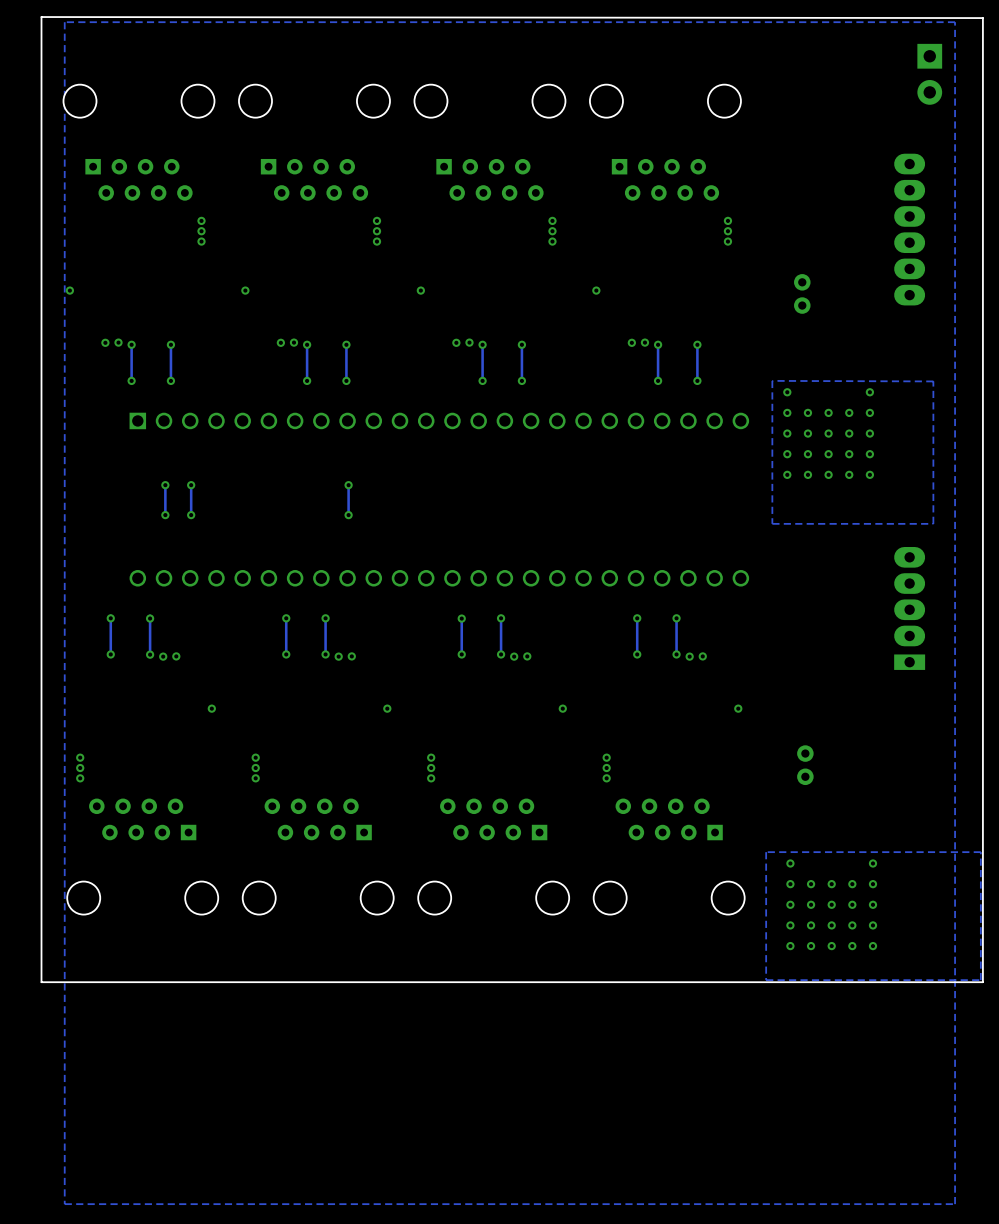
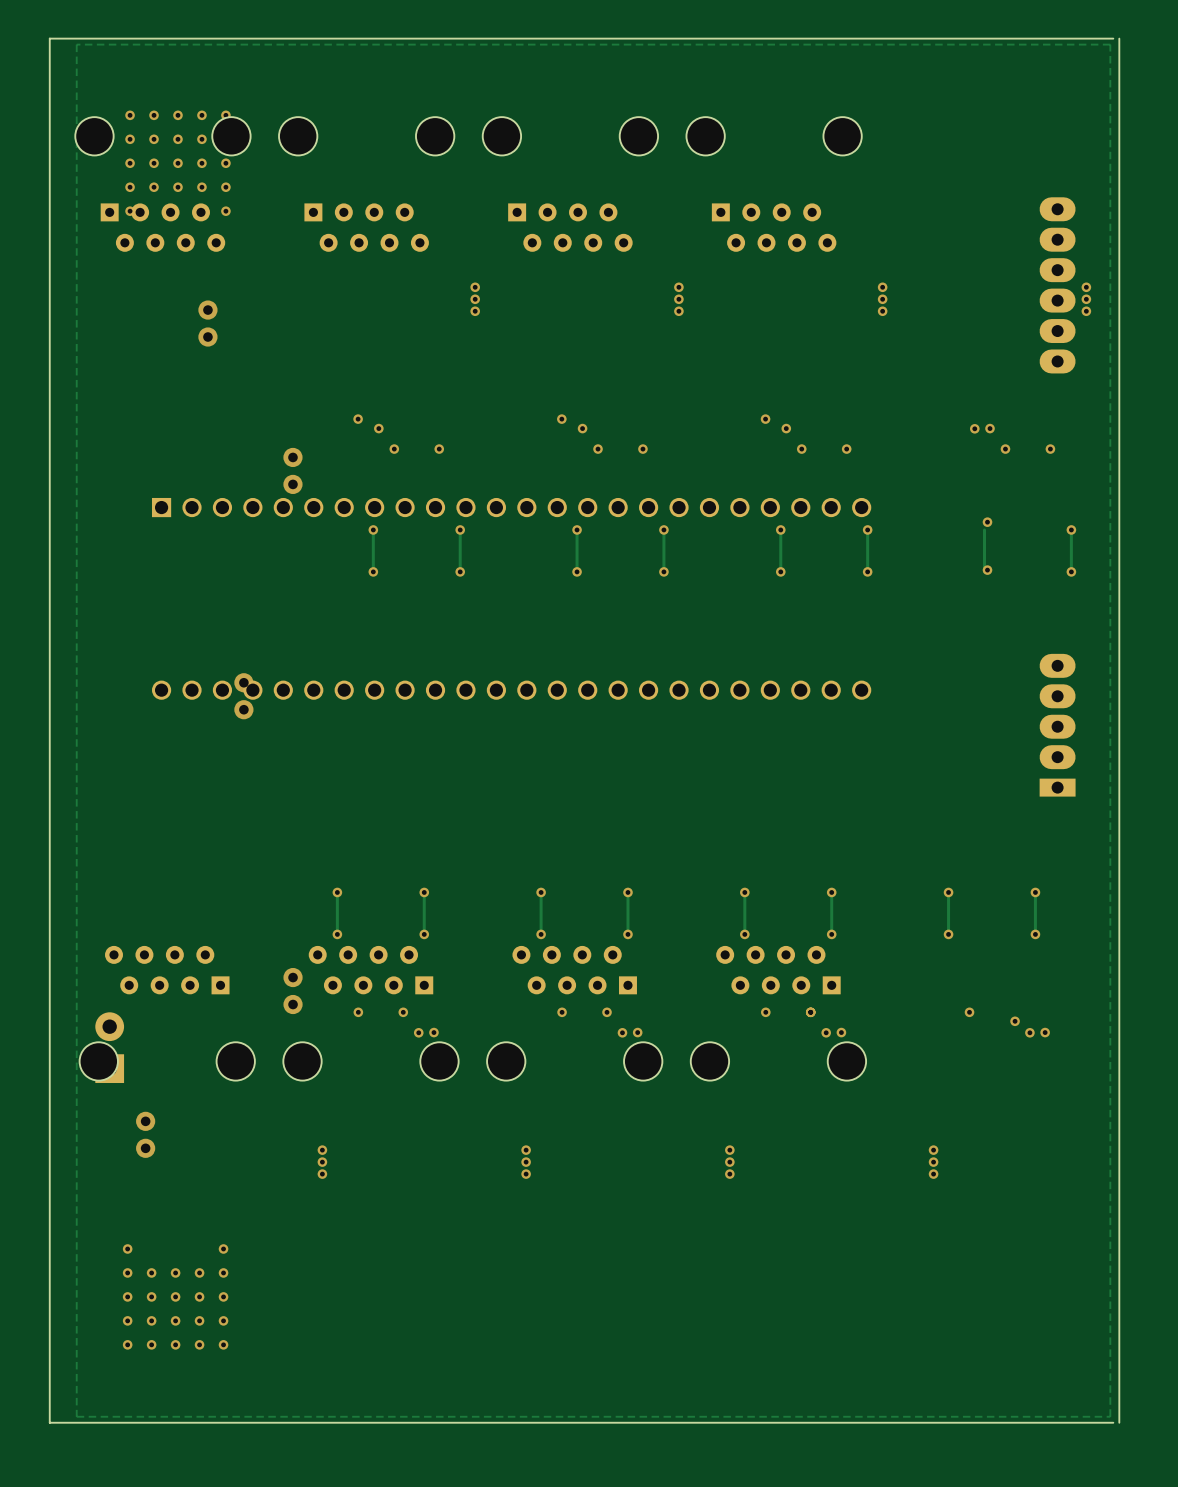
board edge: (41, 17) (982, 18) (982, 982) (41, 982) -> (49, 38) (1113, 38)
board edge: none -> (1119, 38) (1119, 1422)
part: (929, 74) -> none
via: none -> (130, 115)
via: none -> (154, 115)
via: none -> (177, 115)
via: none -> (201, 115)
via: none -> (225, 115)
via: none -> (130, 139)
via: none -> (154, 139)
via: none -> (177, 139)
via: none -> (201, 139)
via: none -> (130, 163)
via: none -> (154, 163)
via: none -> (177, 163)
via: none -> (201, 163)
via: none -> (225, 163)
via: none -> (130, 187)
via: none -> (154, 187)
via: none -> (177, 187)
via: none -> (201, 187)
via: none -> (225, 187)
via: none -> (130, 211)
via: none -> (225, 211)
via: (201, 220) -> none
via: (376, 220) -> none
via: (552, 220) -> none
via: (727, 220) -> none
via: (201, 231) -> none
via: (376, 231) -> none
via: none -> (475, 287)
via: (552, 231) -> none
via: none -> (678, 287)
via: (727, 231) -> none
via: none -> (882, 287)
via: none -> (1086, 287)
via: (201, 241) -> none
via: (376, 241) -> none
via: none -> (475, 299)
via: (552, 241) -> none
via: none -> (678, 299)
via: (727, 241) -> none
via: none -> (882, 299)
via: none -> (1086, 299)
via: none -> (207, 310)
via: none -> (475, 311)
via: none -> (678, 311)
via: none -> (882, 311)
via: none -> (1086, 311)
via: none -> (207, 337)
via: (802, 282) -> none
via: (69, 290) -> none
via: (245, 290) -> none
via: (420, 290) -> none
via: (596, 290) -> none
via: (802, 305) -> none
via: (105, 342) -> none
via: (118, 342) -> none
via: (280, 342) -> none
via: (293, 342) -> none
via: (456, 342) -> none
via: (469, 342) -> none
via: (631, 342) -> none
via: (644, 342) -> none
track: (131, 344) (131, 380) -> none
via: (131, 344) -> none
track: (170, 344) (170, 380) -> (373, 529) (373, 571)
via: (170, 344) -> none
track: (307, 344) (307, 380) -> (460, 529) (460, 571)
track: (346, 344) (346, 380) -> (577, 529) (577, 571)
via: (346, 344) -> none
track: (482, 344) (482, 380) -> (663, 529) (663, 571)
track: (521, 344) (521, 380) -> (780, 529) (780, 571)
via: (521, 344) -> none
track: (658, 344) (658, 380) -> (867, 529) (867, 571)
track: (697, 344) (697, 380) -> (984, 529) (984, 571)
via: (697, 344) -> none
via: none -> (378, 428)
via: none -> (582, 428)
via: none -> (786, 428)
via: none -> (990, 428)
via: none -> (974, 428)
via: none -> (439, 449)
via: none -> (642, 449)
via: none -> (846, 449)
via: none -> (1005, 449)
via: none -> (1050, 449)
via: none -> (292, 457)
via: (131, 380) -> none
via: (170, 380) -> none
via: (307, 380) -> none
via position: (346, 380) -> (394, 449)
via: (482, 380) -> none
via position: (521, 380) -> (598, 449)
via: (658, 380) -> none
via position: (697, 380) -> (801, 449)
zone outline: (772, 380) (772, 523) (933, 523) (933, 381) (772, 380) -> none
via: (787, 392) -> none
via: (869, 392) -> none
via: none -> (292, 484)
via: (787, 412) -> none
via: (807, 412) -> none
via: (828, 412) -> none
via: (849, 412) -> none
via: (869, 412) -> none
via: (787, 433) -> none
via: (807, 433) -> none
via: (828, 433) -> none
via: (869, 433) -> none
via: none -> (373, 529)
via: none -> (460, 529)
via: none -> (577, 529)
via: none -> (663, 529)
via: none -> (780, 529)
via: none -> (867, 529)
track: none -> (1071, 529) (1071, 571)
via: none -> (1071, 529)
via: (787, 454) -> none
via: (807, 454) -> none
via: (828, 454) -> none
via: (849, 454) -> none
via: (869, 454) -> none
via: (787, 474) -> none
via: (807, 474) -> none
via: (828, 474) -> none
via: (869, 474) -> none
via: none -> (373, 571)
via: none -> (460, 571)
via: none -> (577, 571)
via: none -> (663, 571)
via: none -> (780, 571)
via: none -> (867, 571)
via: none -> (1071, 571)
track: (165, 485) (165, 515) -> none
via: (165, 485) -> none
track: (191, 485) (191, 515) -> none
via: (191, 485) -> none
track: (348, 485) (348, 515) -> none
via: (348, 485) -> none
via: (165, 515) -> none
via: (191, 515) -> none
via: (348, 515) -> none
via: none -> (243, 682)
via: none -> (243, 709)
track: (110, 615) (110, 651) -> none
track: (150, 615) (150, 651) -> none
via: (110, 618) -> none
via: (150, 618) -> none
track: (286, 618) (286, 654) -> (424, 892) (424, 934)
via: (286, 618) -> none
track: (325, 618) (325, 654) -> (337, 892) (337, 934)
via: (325, 618) -> none
track: (461, 618) (461, 654) -> none
via: (461, 618) -> none
track: (501, 618) (501, 654) -> (541, 892) (541, 934)
via: (501, 618) -> none
track: (637, 618) (637, 654) -> (831, 892) (831, 934)
via: (637, 618) -> none
track: (676, 618) (676, 654) -> (744, 892) (744, 934)
via: (676, 618) -> none
via: (110, 654) -> none
via: (150, 654) -> none
via: (286, 654) -> none
via: (325, 654) -> none
via: (461, 654) -> none
via: (501, 654) -> none
via: (637, 654) -> none
via: (676, 654) -> none
via: (163, 656) -> none
via: (176, 656) -> none
via: (338, 656) -> none
via: (351, 656) -> none
via: (514, 656) -> none
via: (527, 656) -> none
via: (689, 656) -> none
via: (702, 656) -> none
via: (211, 708) -> none
via: (387, 708) -> none
via: (562, 708) -> none
via: (738, 708) -> none
via: none -> (337, 892)
via: none -> (424, 892)
via: none -> (541, 892)
track: none -> (627, 892) (627, 934)
via: none -> (627, 892)
via: none -> (744, 892)
via: none -> (831, 892)
track: none -> (948, 892) (948, 934)
via: none -> (948, 892)
track: none -> (1035, 892) (1035, 934)
via: none -> (1035, 892)
via: (805, 753) -> none
via: (80, 757) -> none
via: (255, 757) -> none
via: (431, 757) -> none
via: (606, 757) -> none
via: (80, 768) -> none
via: (255, 768) -> none
via: (431, 768) -> none
via: (606, 768) -> none
via: (805, 776) -> none
via: (80, 778) -> none
via: (255, 778) -> none
via: (431, 778) -> none
via: (606, 778) -> none
via: none -> (337, 934)
via: none -> (424, 934)
via: none -> (541, 934)
via: none -> (627, 934)
via: none -> (744, 934)
via: none -> (831, 934)
via: none -> (948, 934)
via: none -> (1035, 934)
via: none -> (293, 977)
via: none -> (293, 1004)
zone outline: (980, 852) (980, 980) (766, 980) (766, 852) (980, 852) -> none
via: none -> (358, 1012)
via: none -> (403, 1012)
via: none -> (562, 1012)
via: none -> (607, 1012)
via: none -> (765, 1012)
via: none -> (810, 1012)
via: none -> (969, 1012)
via: (790, 863) -> none
via: none -> (418, 1032)
via: none -> (433, 1032)
via: none -> (622, 1032)
via: none -> (637, 1032)
via: none -> (826, 1032)
via: none -> (841, 1032)
via: none -> (1029, 1032)
via: none -> (1045, 1032)
via: (790, 884) -> none
via: (811, 884) -> none
via: (831, 884) -> none
via: (852, 884) -> none
via: (872, 884) -> none
part: none -> (109, 1047)
via: (790, 904) -> none
via: (811, 904) -> none
via: (831, 904) -> none
via: (852, 904) -> none
via: (872, 904) -> none
via: (790, 925) -> none
via: (811, 925) -> none
via: (831, 925) -> none
via: (852, 925) -> none
via: (872, 925) -> none
via: (790, 946) -> none
via: (811, 946) -> none
via: (831, 946) -> none
via: (852, 946) -> none
via: (872, 946) -> none
via: none -> (145, 1121)
via: none -> (145, 1148)
via: none -> (322, 1150)
via: none -> (526, 1150)
via: none -> (729, 1150)
via: none -> (933, 1150)
board edge: none -> (49, 1159) (49, 1422) (1113, 1422)
via: none -> (322, 1162)
via: none -> (526, 1162)
via: none -> (729, 1162)
via: none -> (933, 1162)
via: none -> (322, 1174)
via: none -> (526, 1174)
via: none -> (729, 1174)
via: none -> (933, 1174)
via: none -> (127, 1248)
via: none -> (223, 1248)
via: none -> (127, 1272)
via: none -> (151, 1272)
via: none -> (175, 1272)
via: none -> (199, 1272)
via: none -> (223, 1272)
via: none -> (127, 1296)
via: none -> (151, 1296)
via: none -> (175, 1296)
via: none -> (199, 1296)
via: none -> (223, 1296)
via: none -> (127, 1320)
via: none -> (151, 1320)
via: none -> (175, 1320)
via: none -> (199, 1320)
via: none -> (223, 1320)
via: none -> (127, 1344)
via: none -> (151, 1344)
via: none -> (175, 1344)
via: none -> (199, 1344)
via: none -> (223, 1344)

